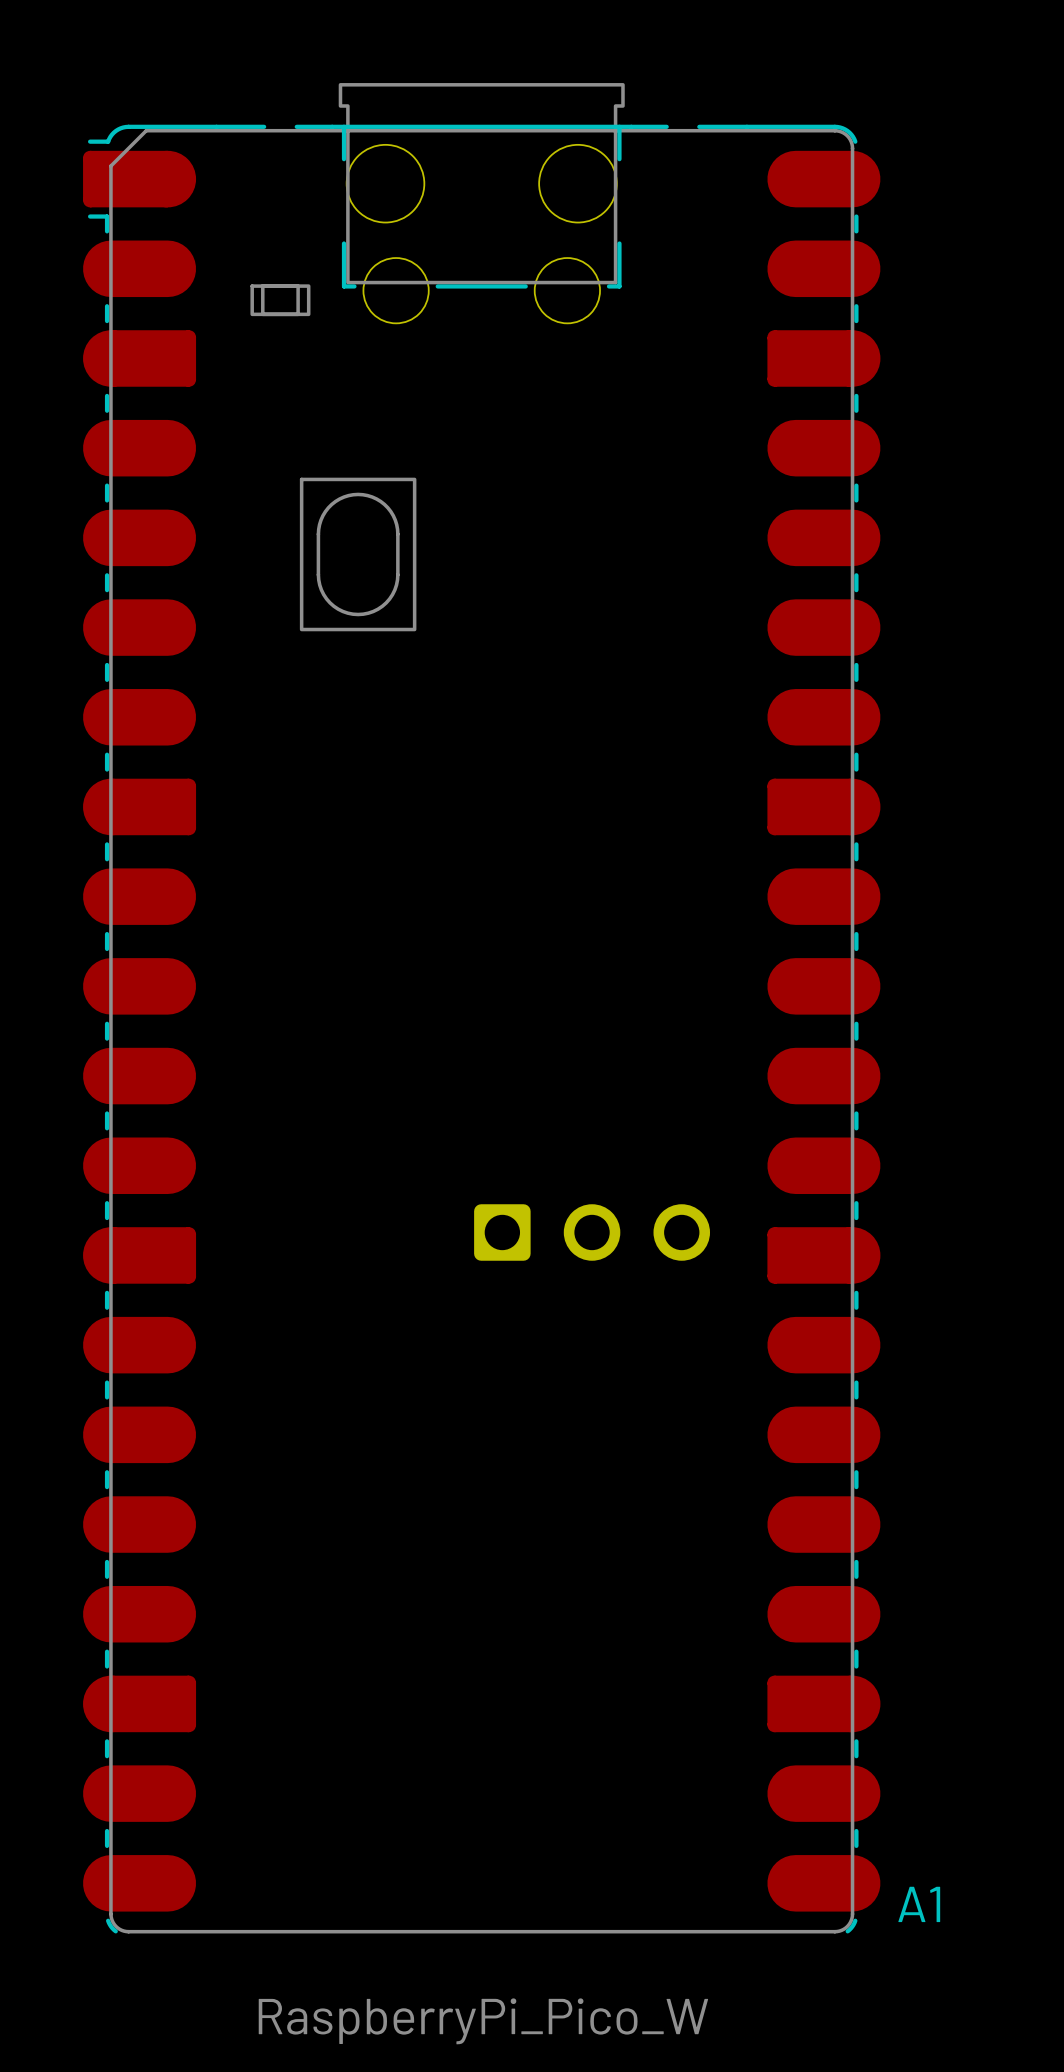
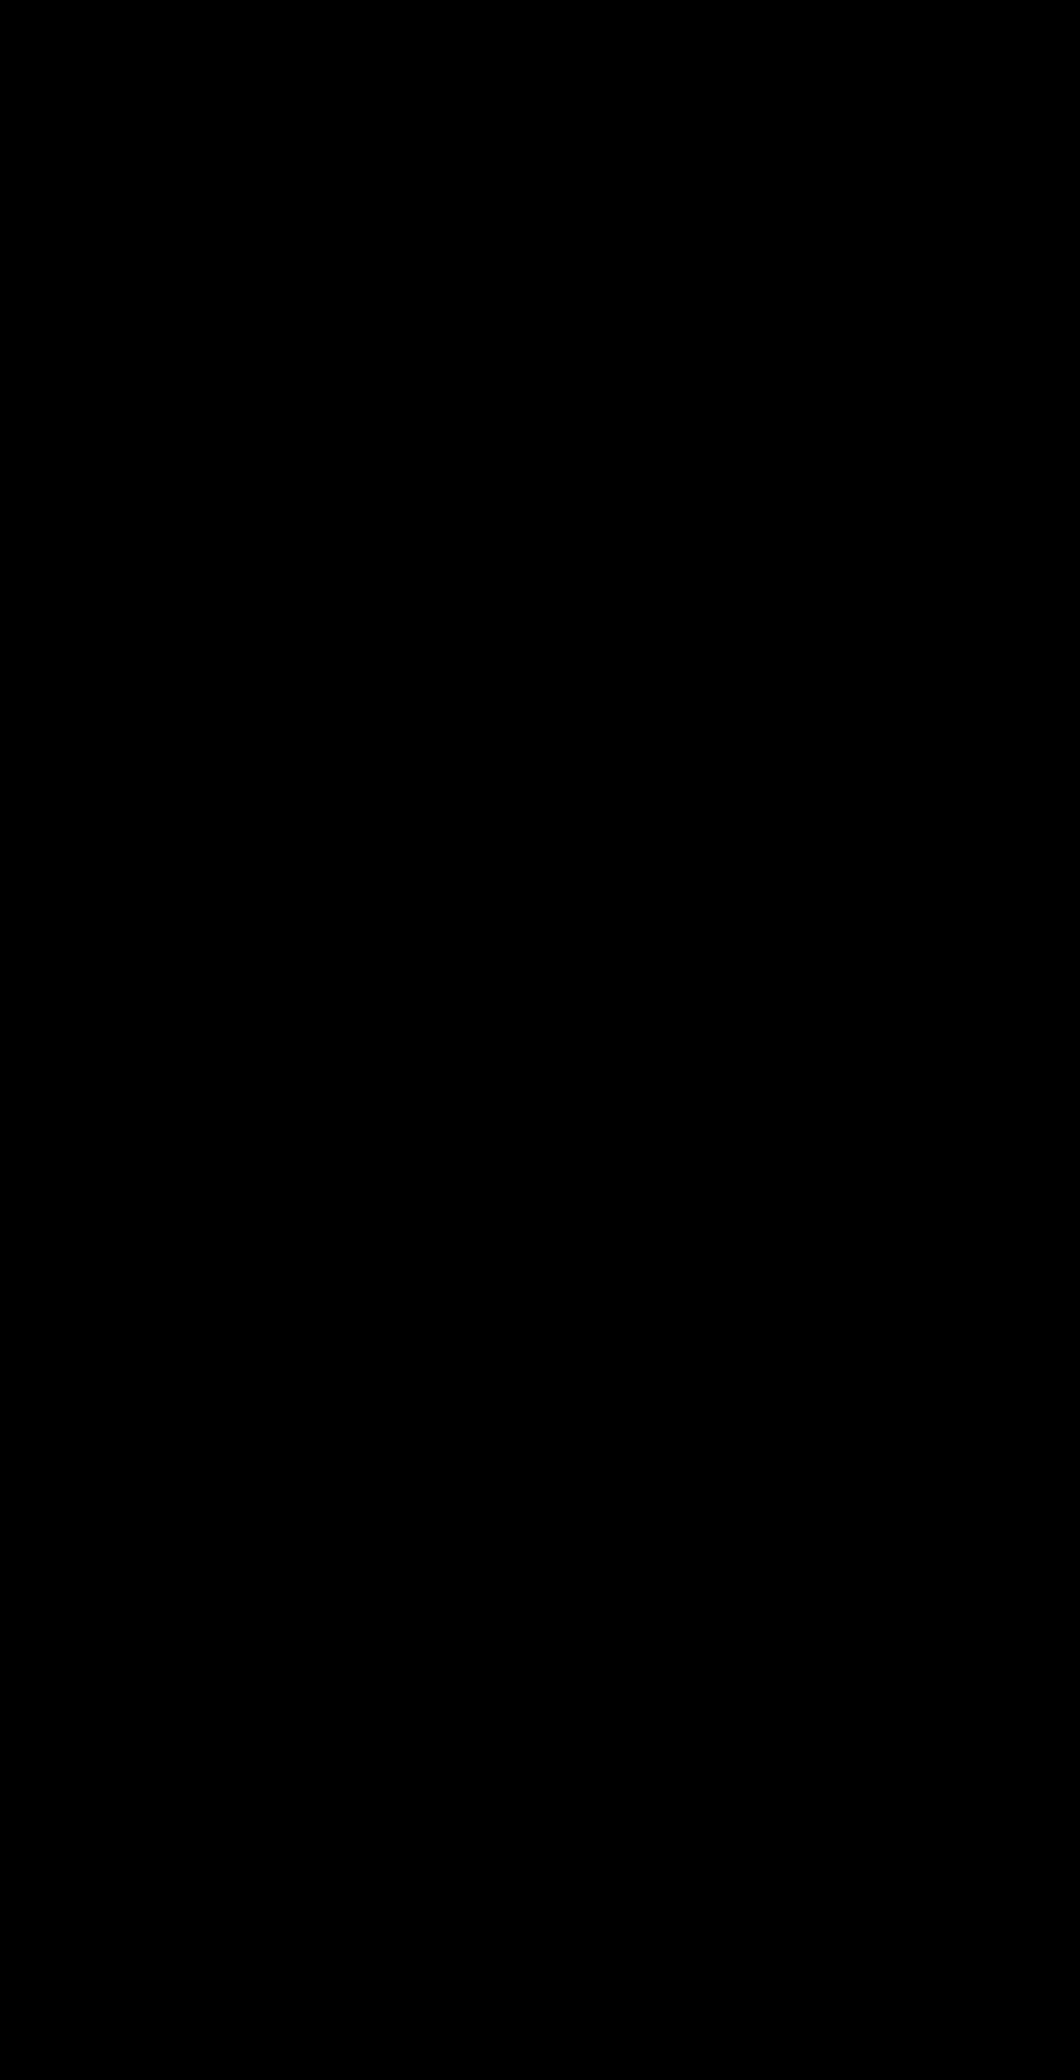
A1: RaspberryPi_Pico_W (481, 1008) -> none

